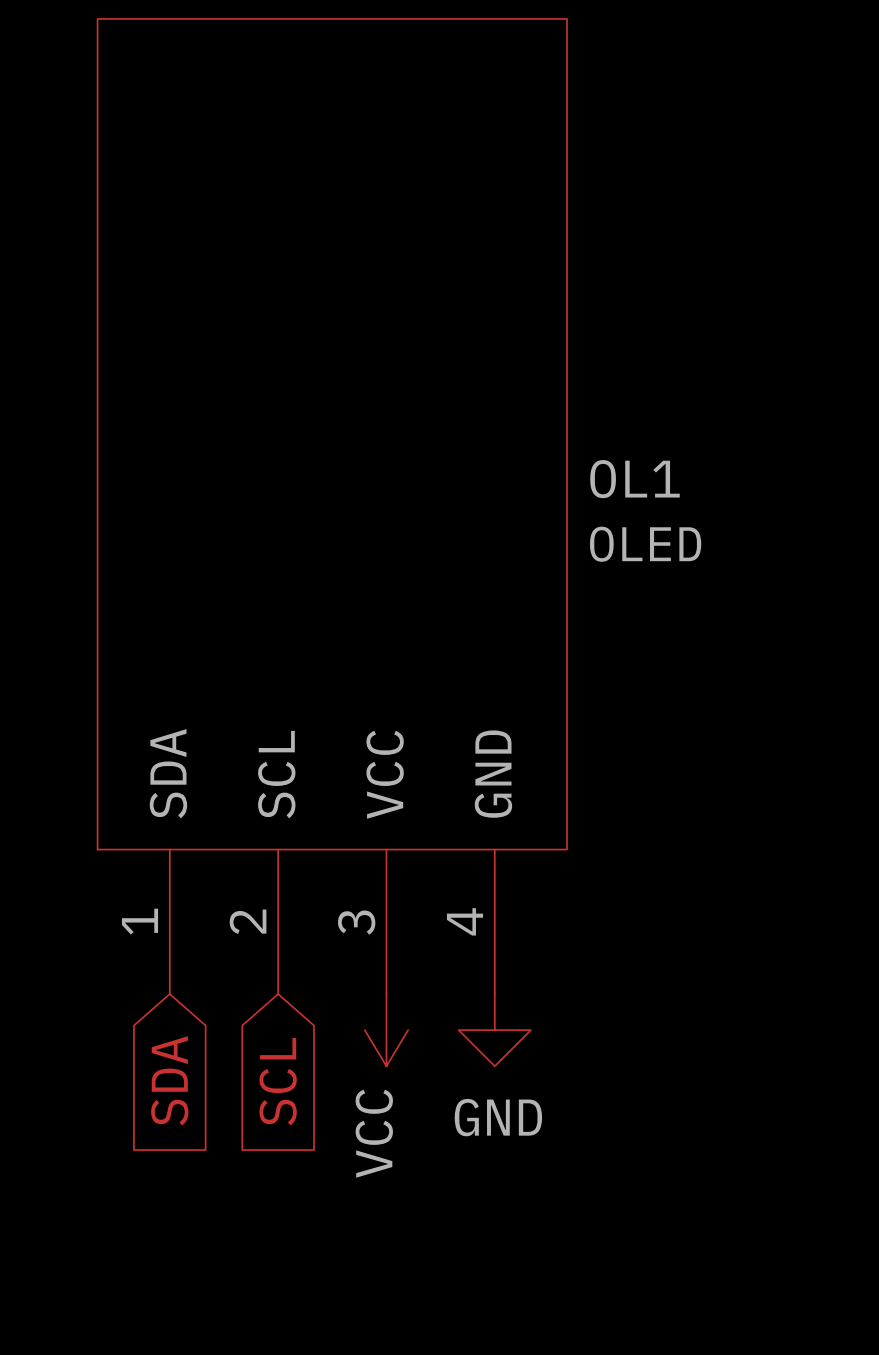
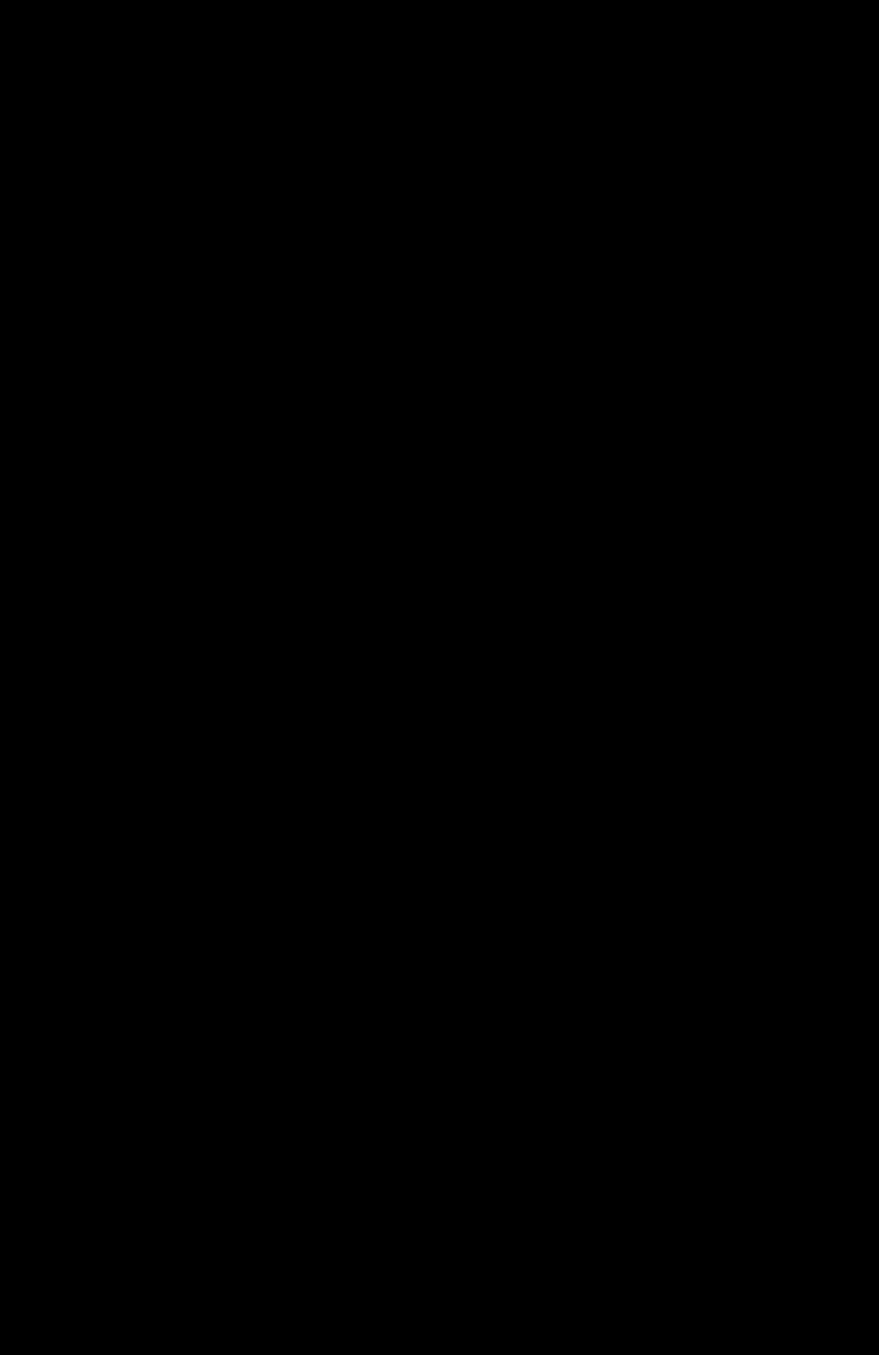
OL1: OLED (332, 506) -> none
power symbol: VCC (386, 1030) -> none
power symbol: GND (494, 1030) -> none
global label: SDA (169, 1080) -> none
global label: SCL (278, 1081) -> none

